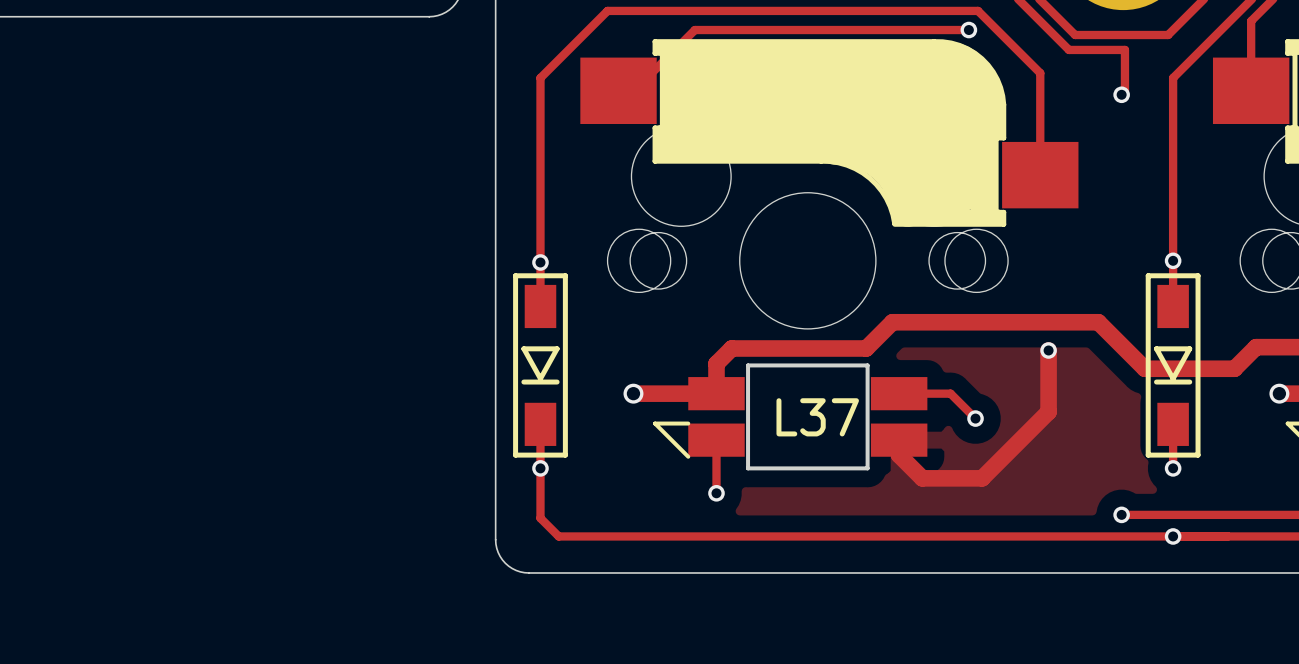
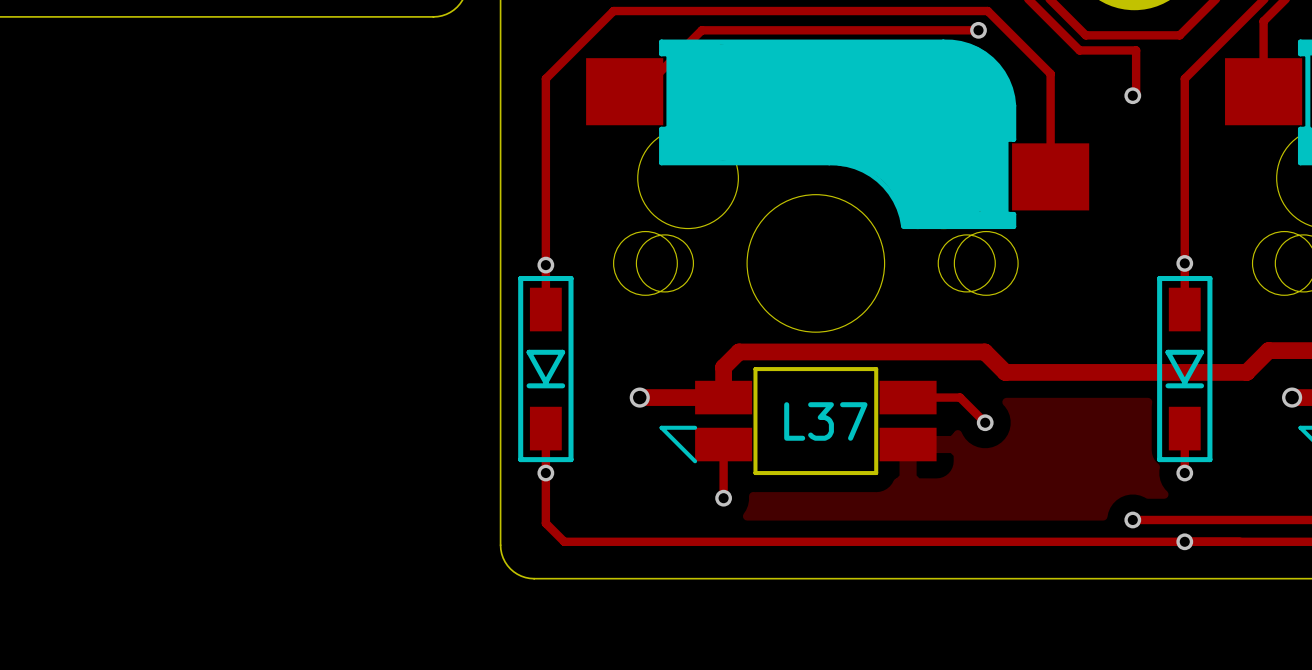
track: (866, 348) (892, 322) (1098, 322) (1144, 368) -> (874, 351) (984, 351) (1005, 372) (1156, 372)
track: (1048, 350) (1048, 411) (982, 478) (922, 478) (899, 455) (899, 440) -> none
via: (1048, 350) -> none

